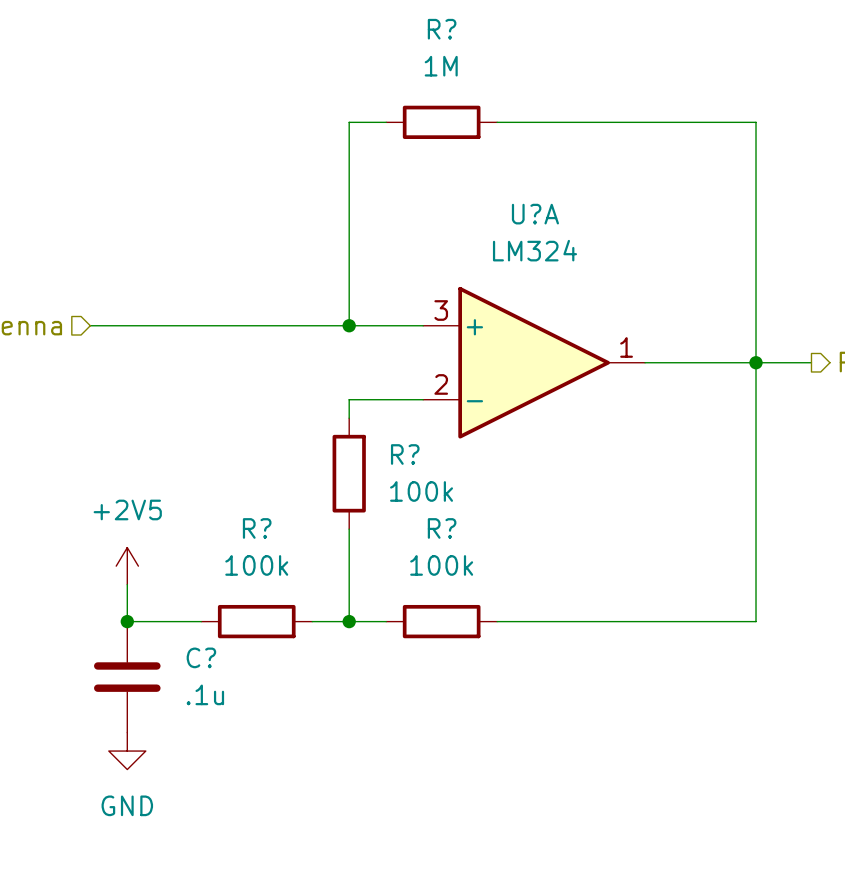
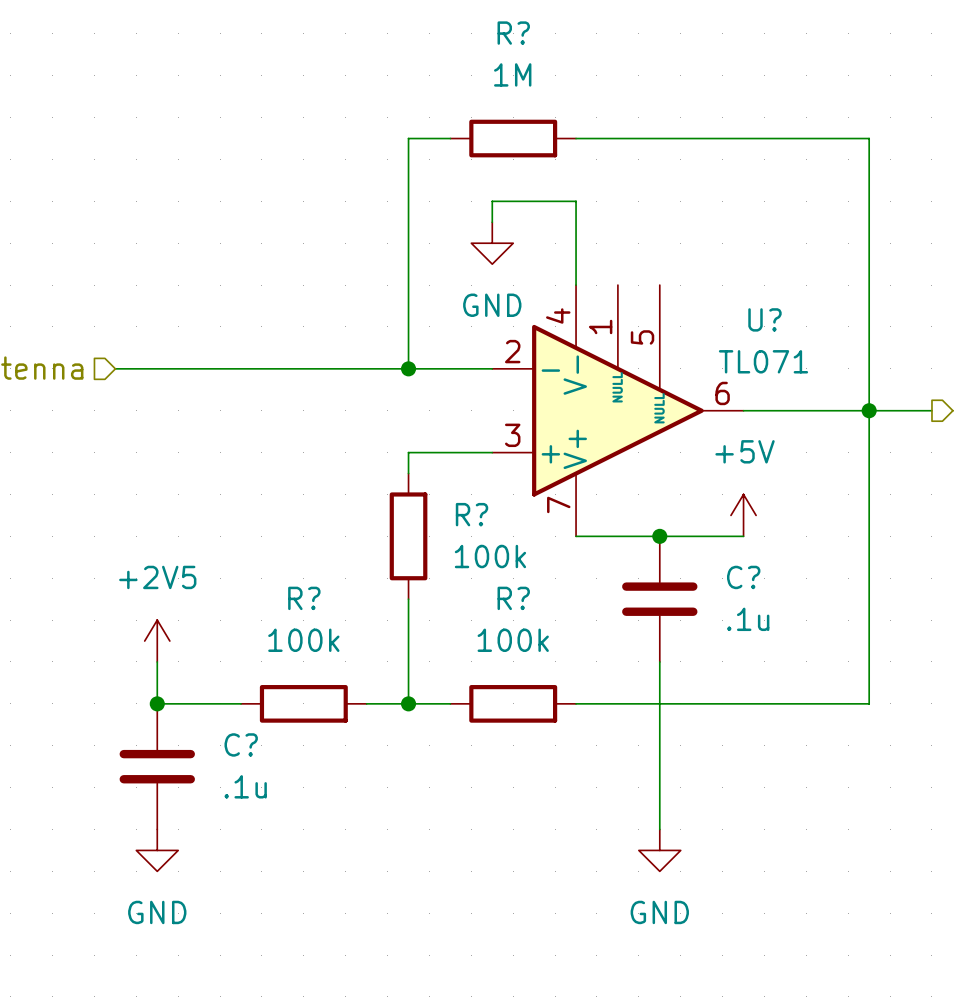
wire: none -> (492, 222) (492, 201) (576, 201) (576, 285)
power symbol: none -> GND (492, 243)
U?A: LM324 (534, 362) -> none
U?: none -> TL071 (617, 410)
power symbol: none -> +5V (743, 515)
wire: none -> (576, 536) (743, 536)
junction: none -> (659, 536)
C?: none -> .1u (659, 599)
wire: none -> (659, 661) (659, 829)
power symbol: none -> GND (659, 850)

